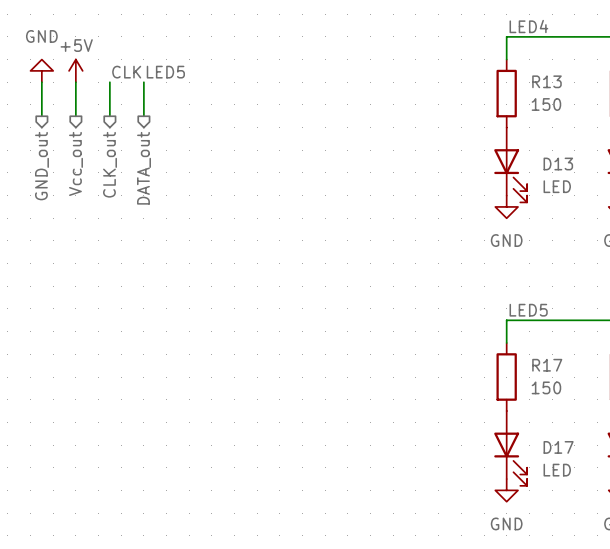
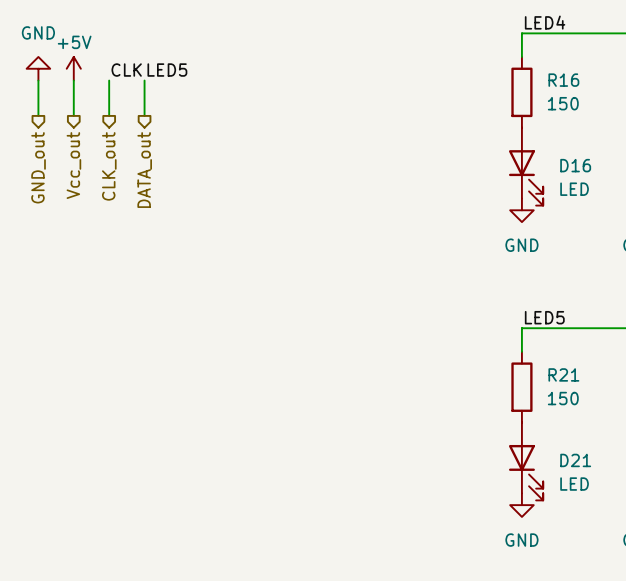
R13 name: R13 (546, 81) -> R16 (563, 80)
D13 name: D13 (558, 164) -> D16 (575, 165)
R17 name: R17 (547, 365) -> R21 (563, 374)
D17 name: D17 (558, 447) -> D21 (575, 460)

